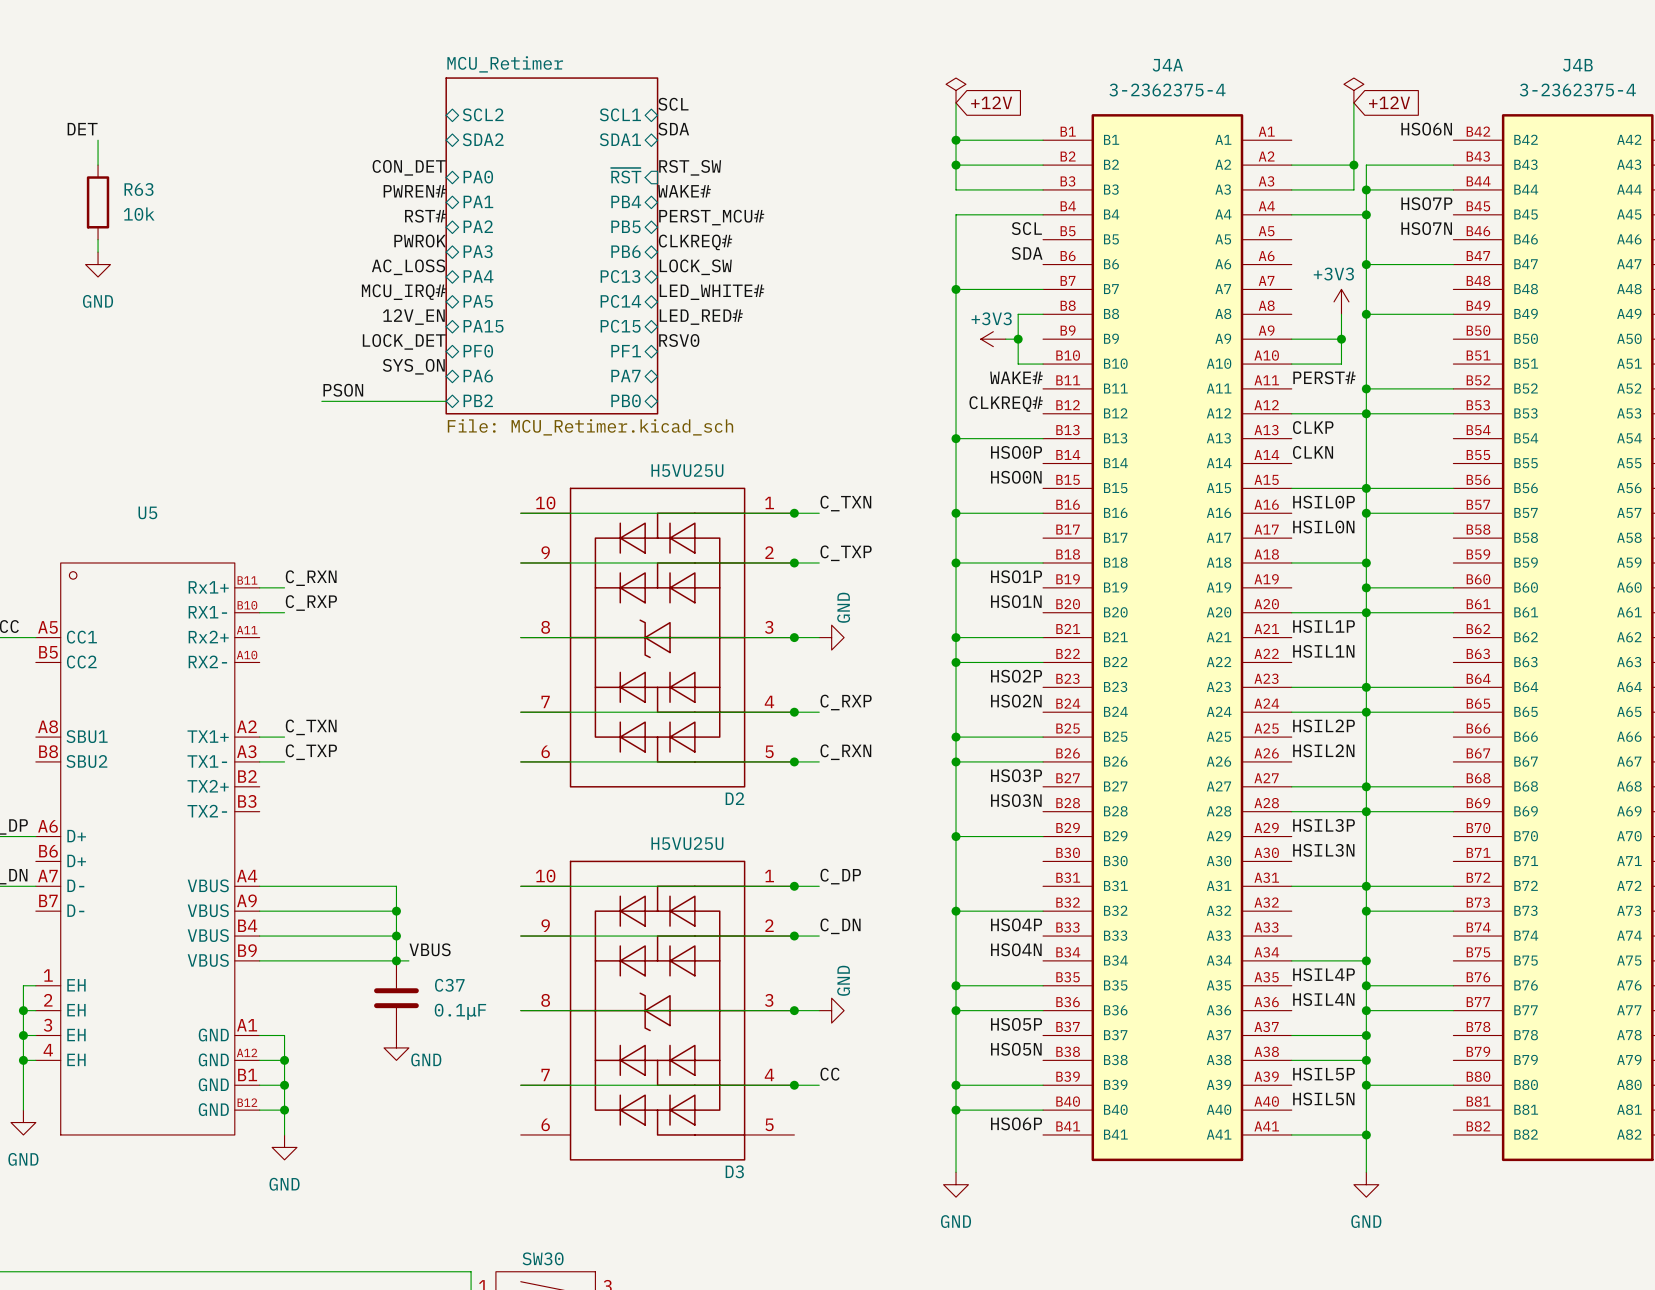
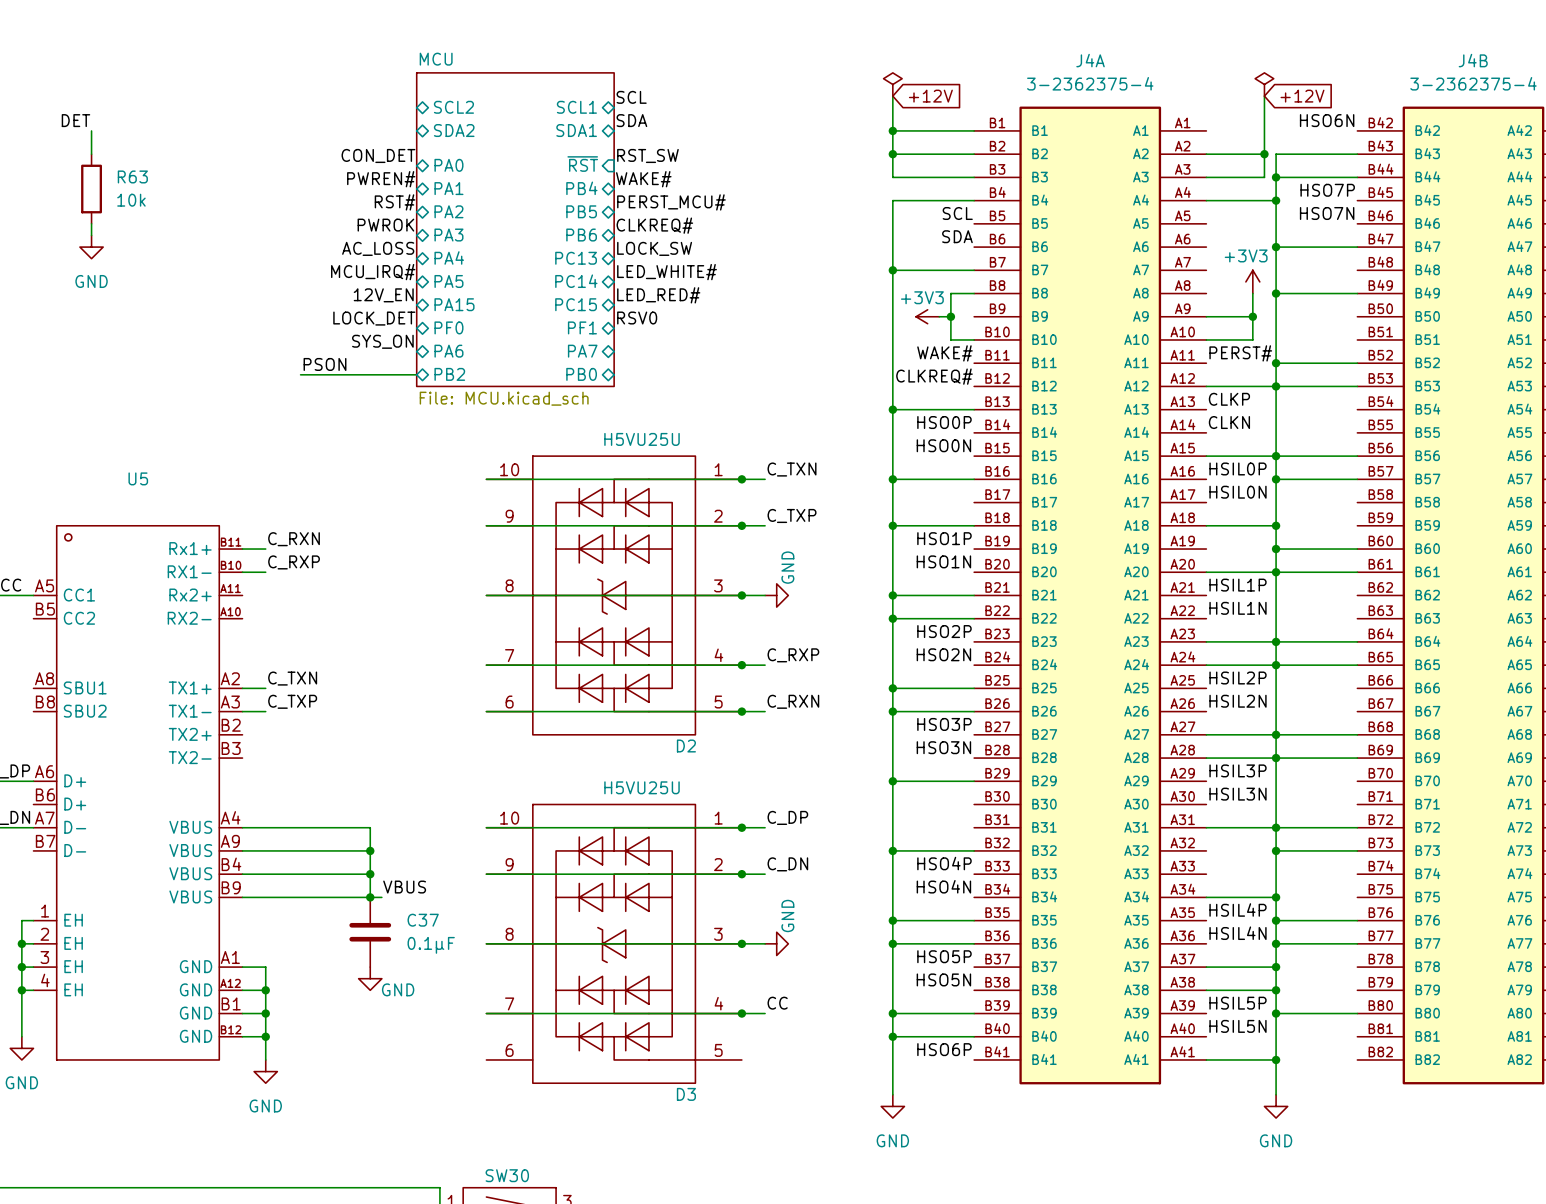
sheet MCU_Retimer name: MCU_Retimer (505, 64) -> MCU (436, 59)
sheet MCU_Retimer value: File: MCU_Retimer.kicad_sch (590, 427) -> File: MCU.kicad_sch (504, 398)

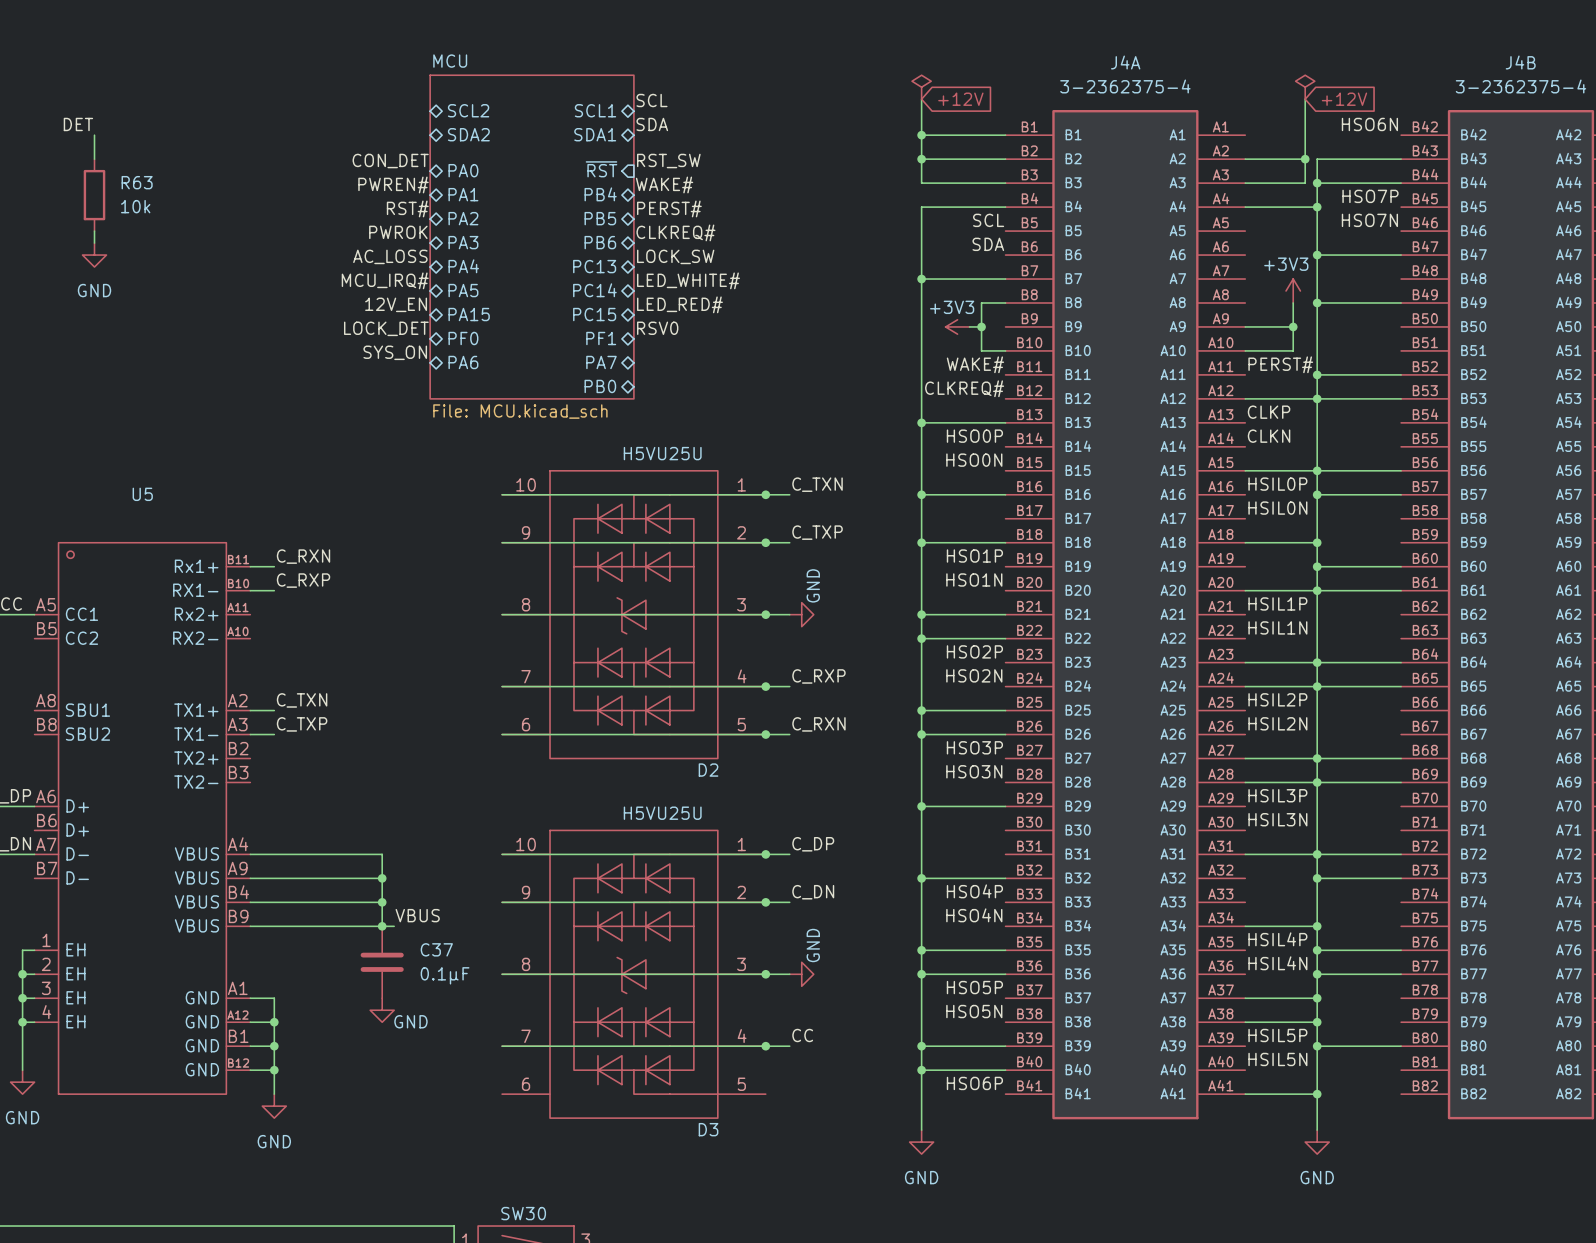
label: PERST_MCU# (671, 202) -> PERST# (669, 208)
label: PSON (325, 364) -> none
wire: (300, 374) (416, 374) -> none
sheet pin: PB2 (449, 374) -> none

